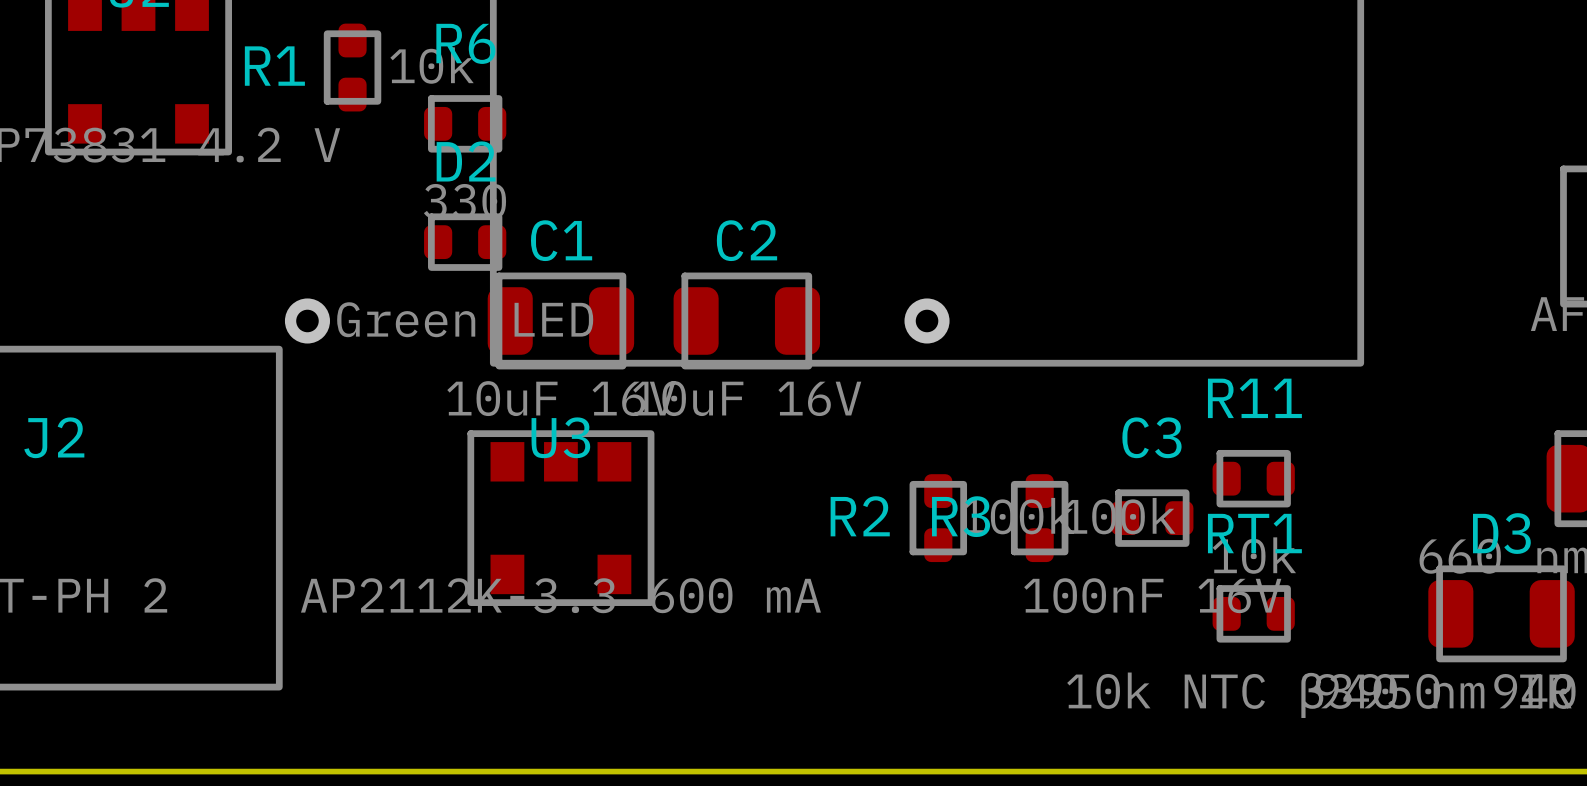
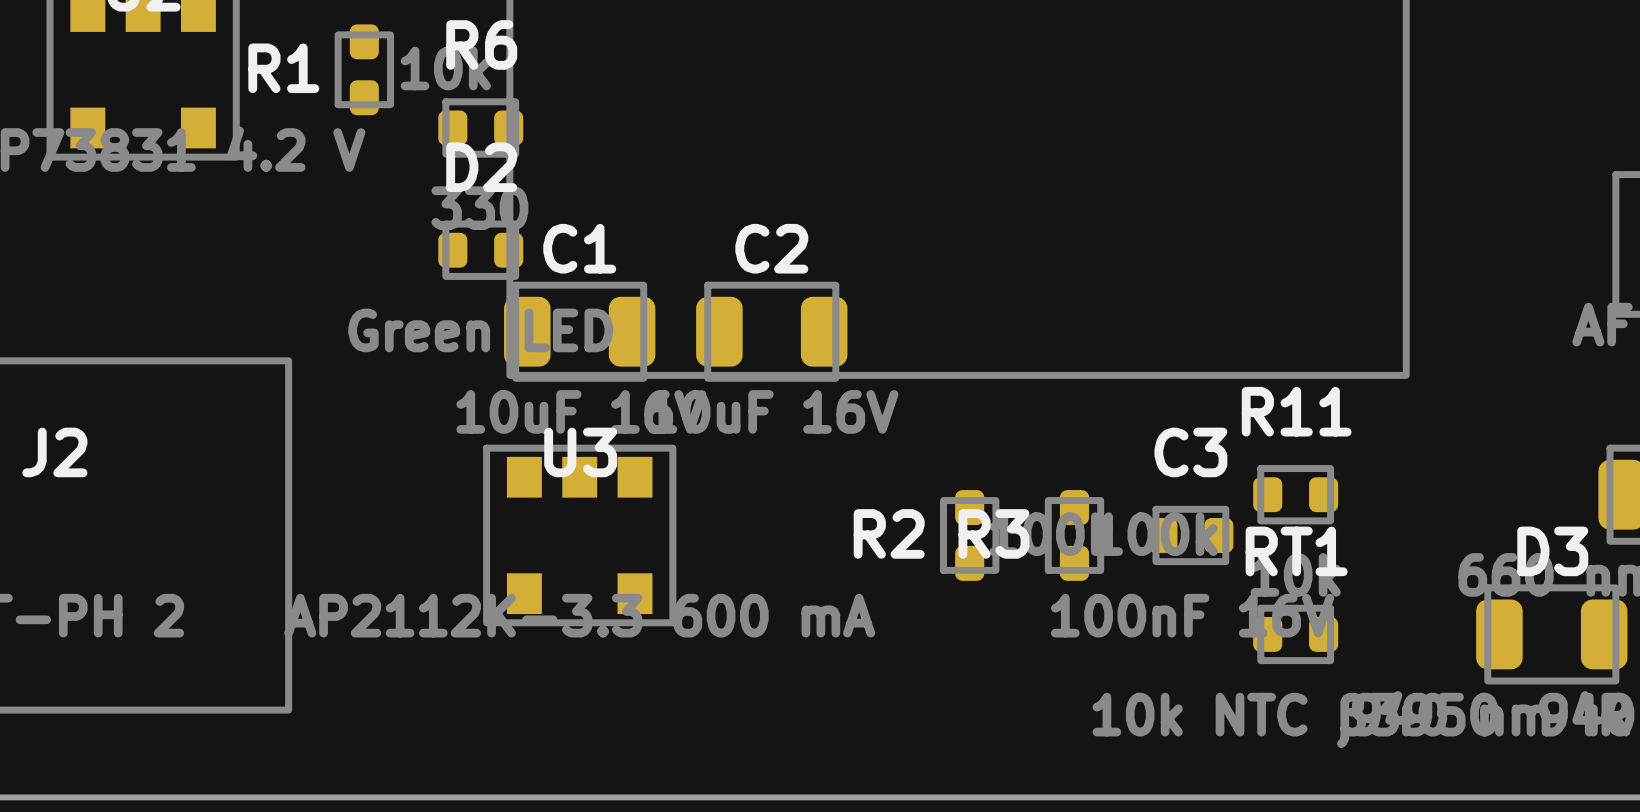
via: (307, 320) -> none
via: (927, 320) -> none

